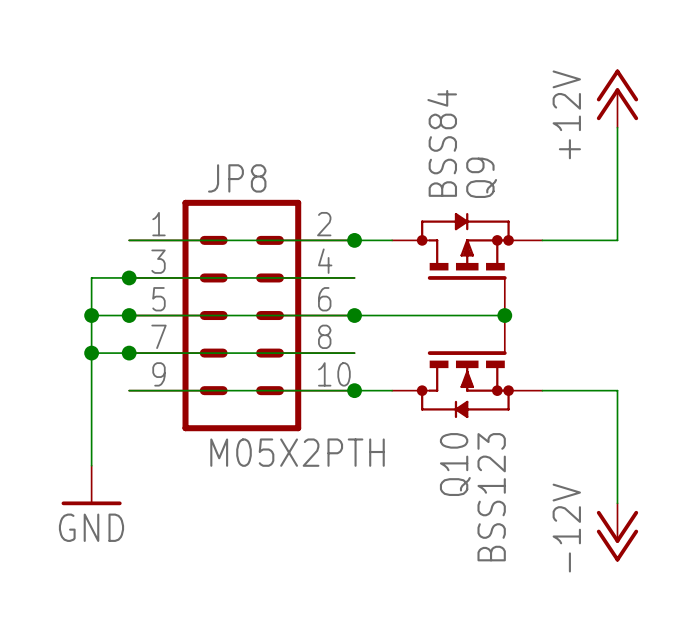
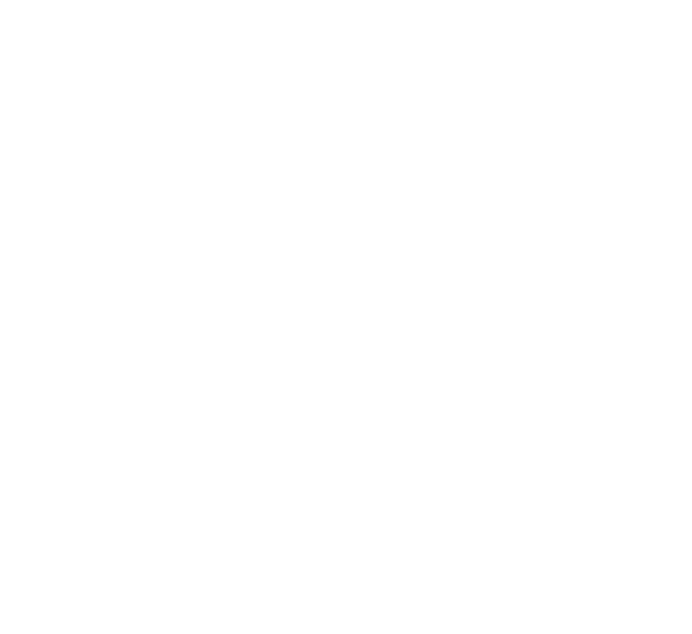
power symbol: +12V (617, 98) -> none
wire: (617, 127) (617, 240) (542, 240) -> none
wire: (129, 240) (392, 240) -> none
junction: (354, 240) -> none
Q9: BSS84 (467, 264) -> none
junction: (129, 277) -> none
wire: (354, 277) (91, 277) (91, 465) -> none
wire: (91, 315) (504, 315) -> none
junction: (91, 315) -> none
junction: (129, 315) -> none
JP8: M05X2PTH (241, 315) -> none
junction: (354, 315) -> none
junction: (504, 315) -> none
wire: (91, 353) (354, 353) -> none
junction: (91, 353) -> none
junction: (129, 353) -> none
Q10: BSS123 (467, 366) -> none
wire: (129, 390) (392, 390) -> none
junction: (354, 390) -> none
wire: (542, 390) (617, 390) (617, 503) -> none
power symbol: GND (91, 485) -> none
power symbol: -12V (617, 532) -> none

